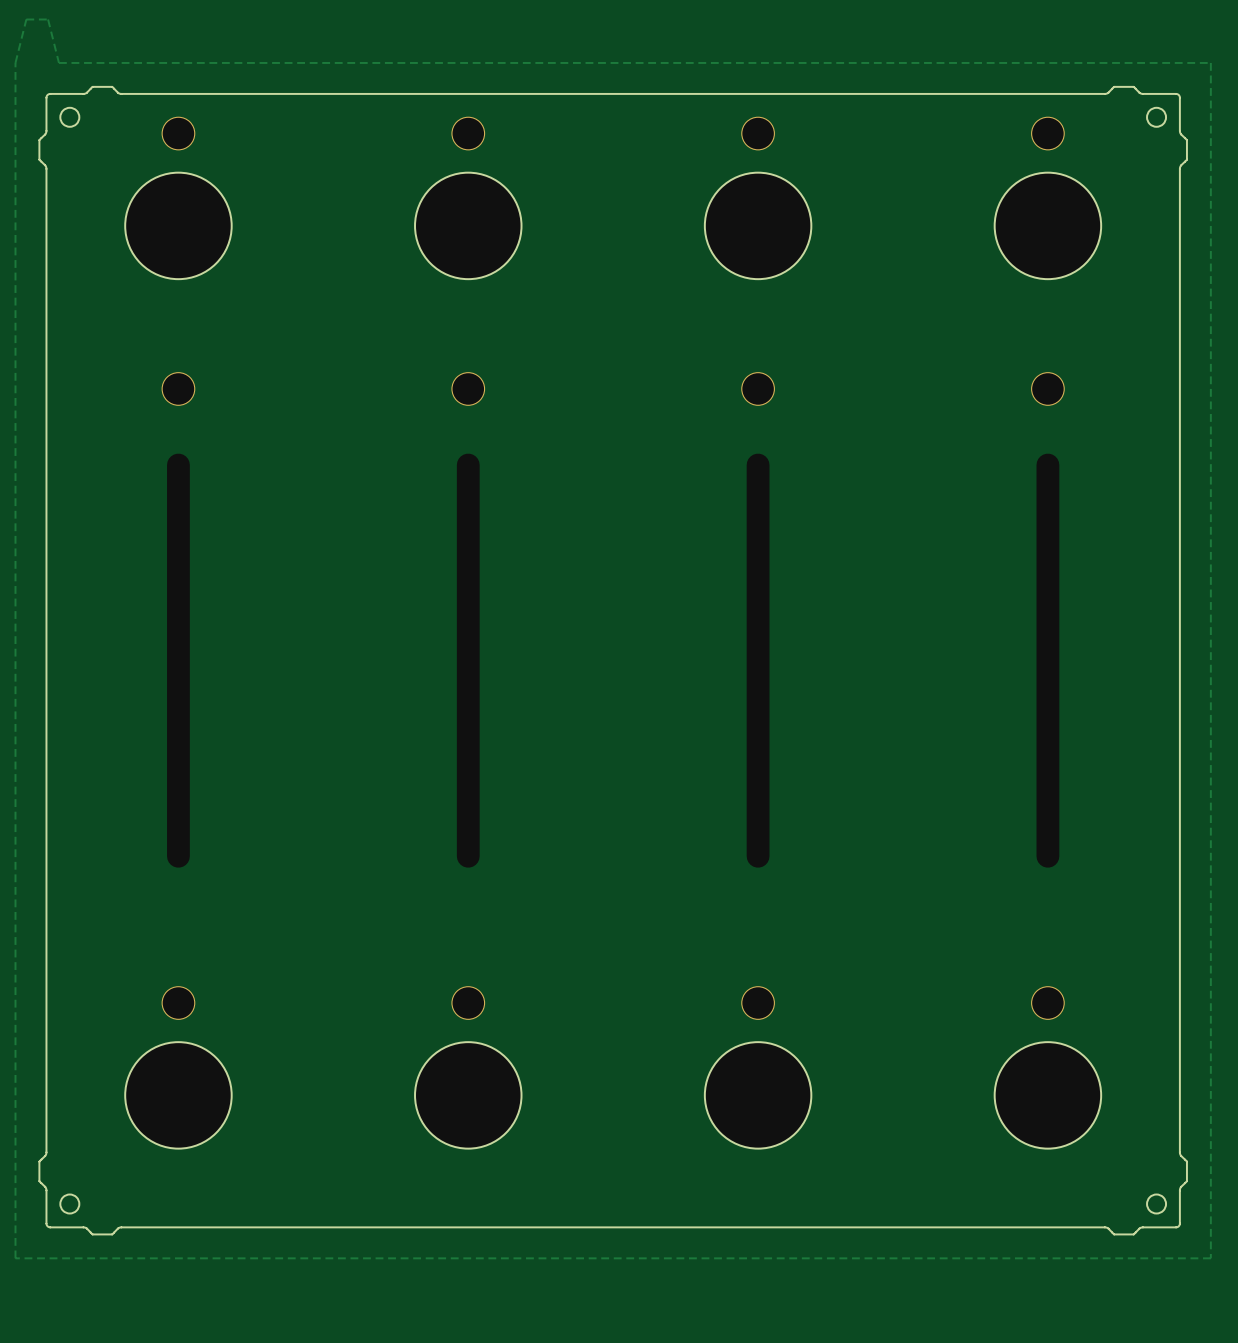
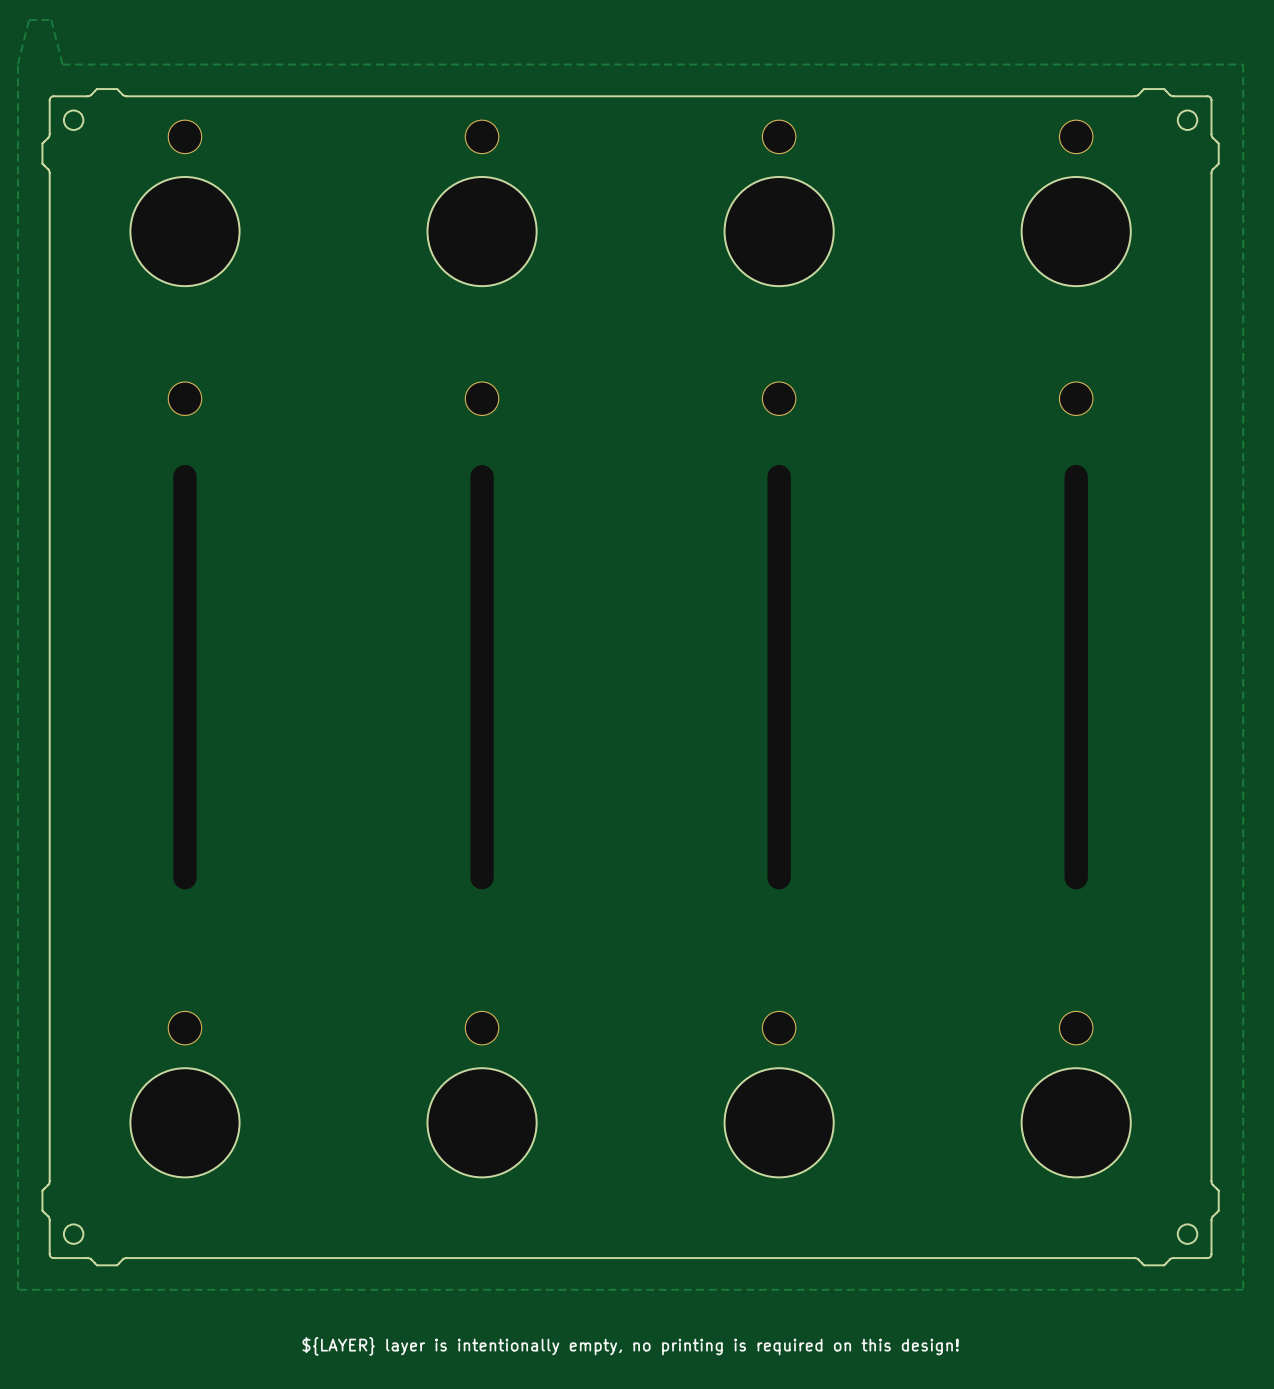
text: none -> ${LAYER} layer is intentionally empty, no printing is required on this design! (630, 1346)

